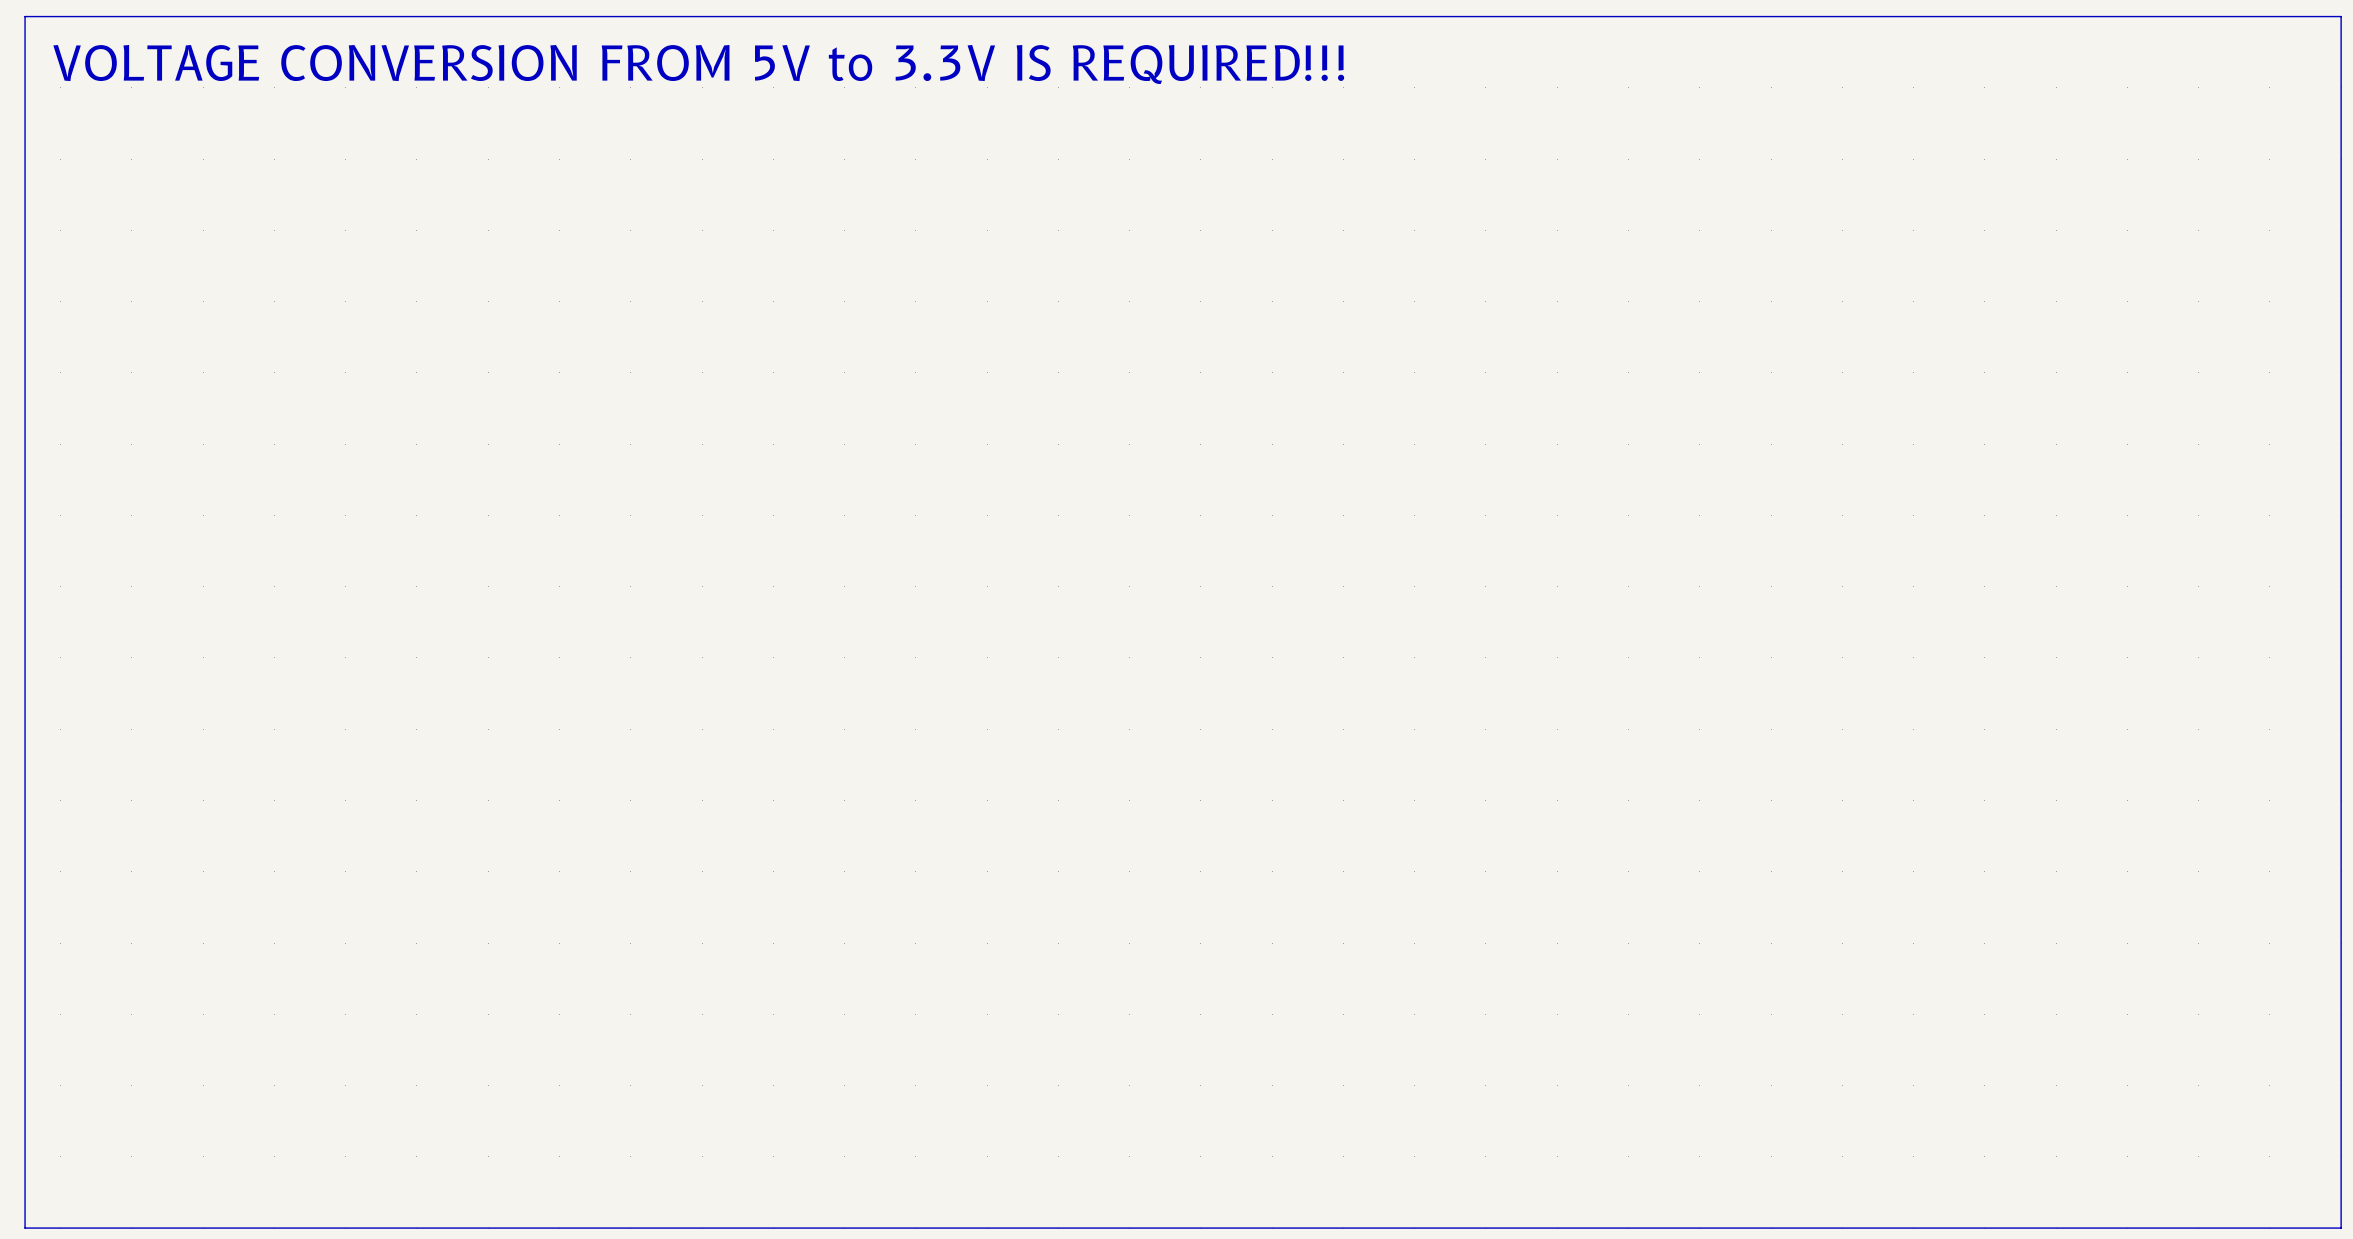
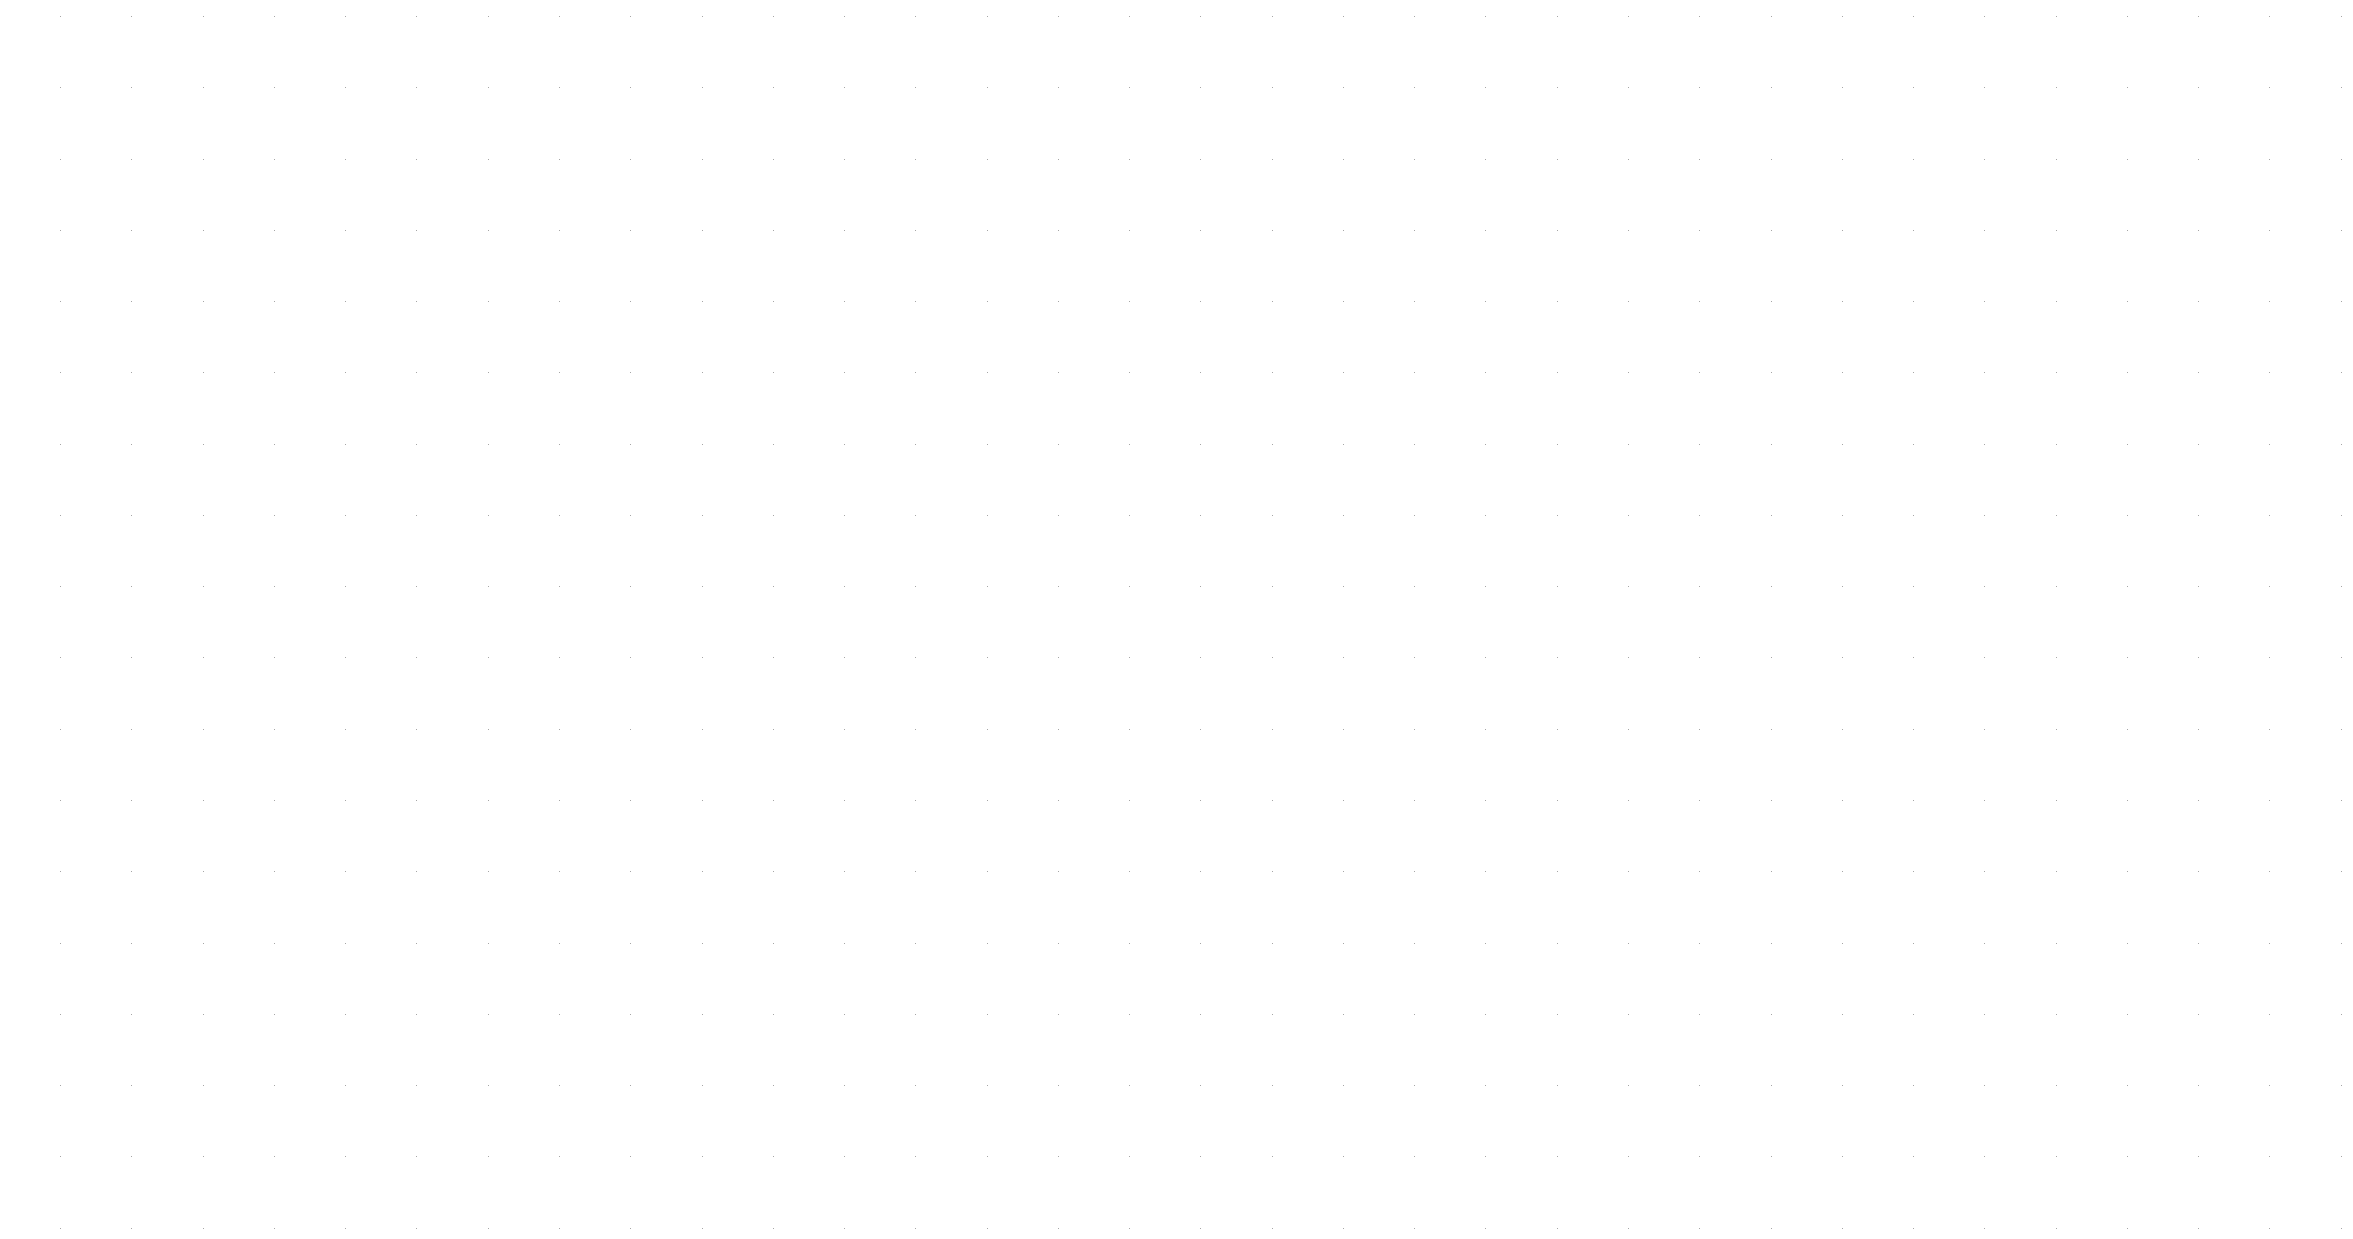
line: (25, 16) (2341, 16) (2341, 1228) (25, 1228) (25, 16) -> none
text: VOLTAGE CONVERSION FROM 5V to 3.3V IS REQUIRED!!! (698, 64) -> none

